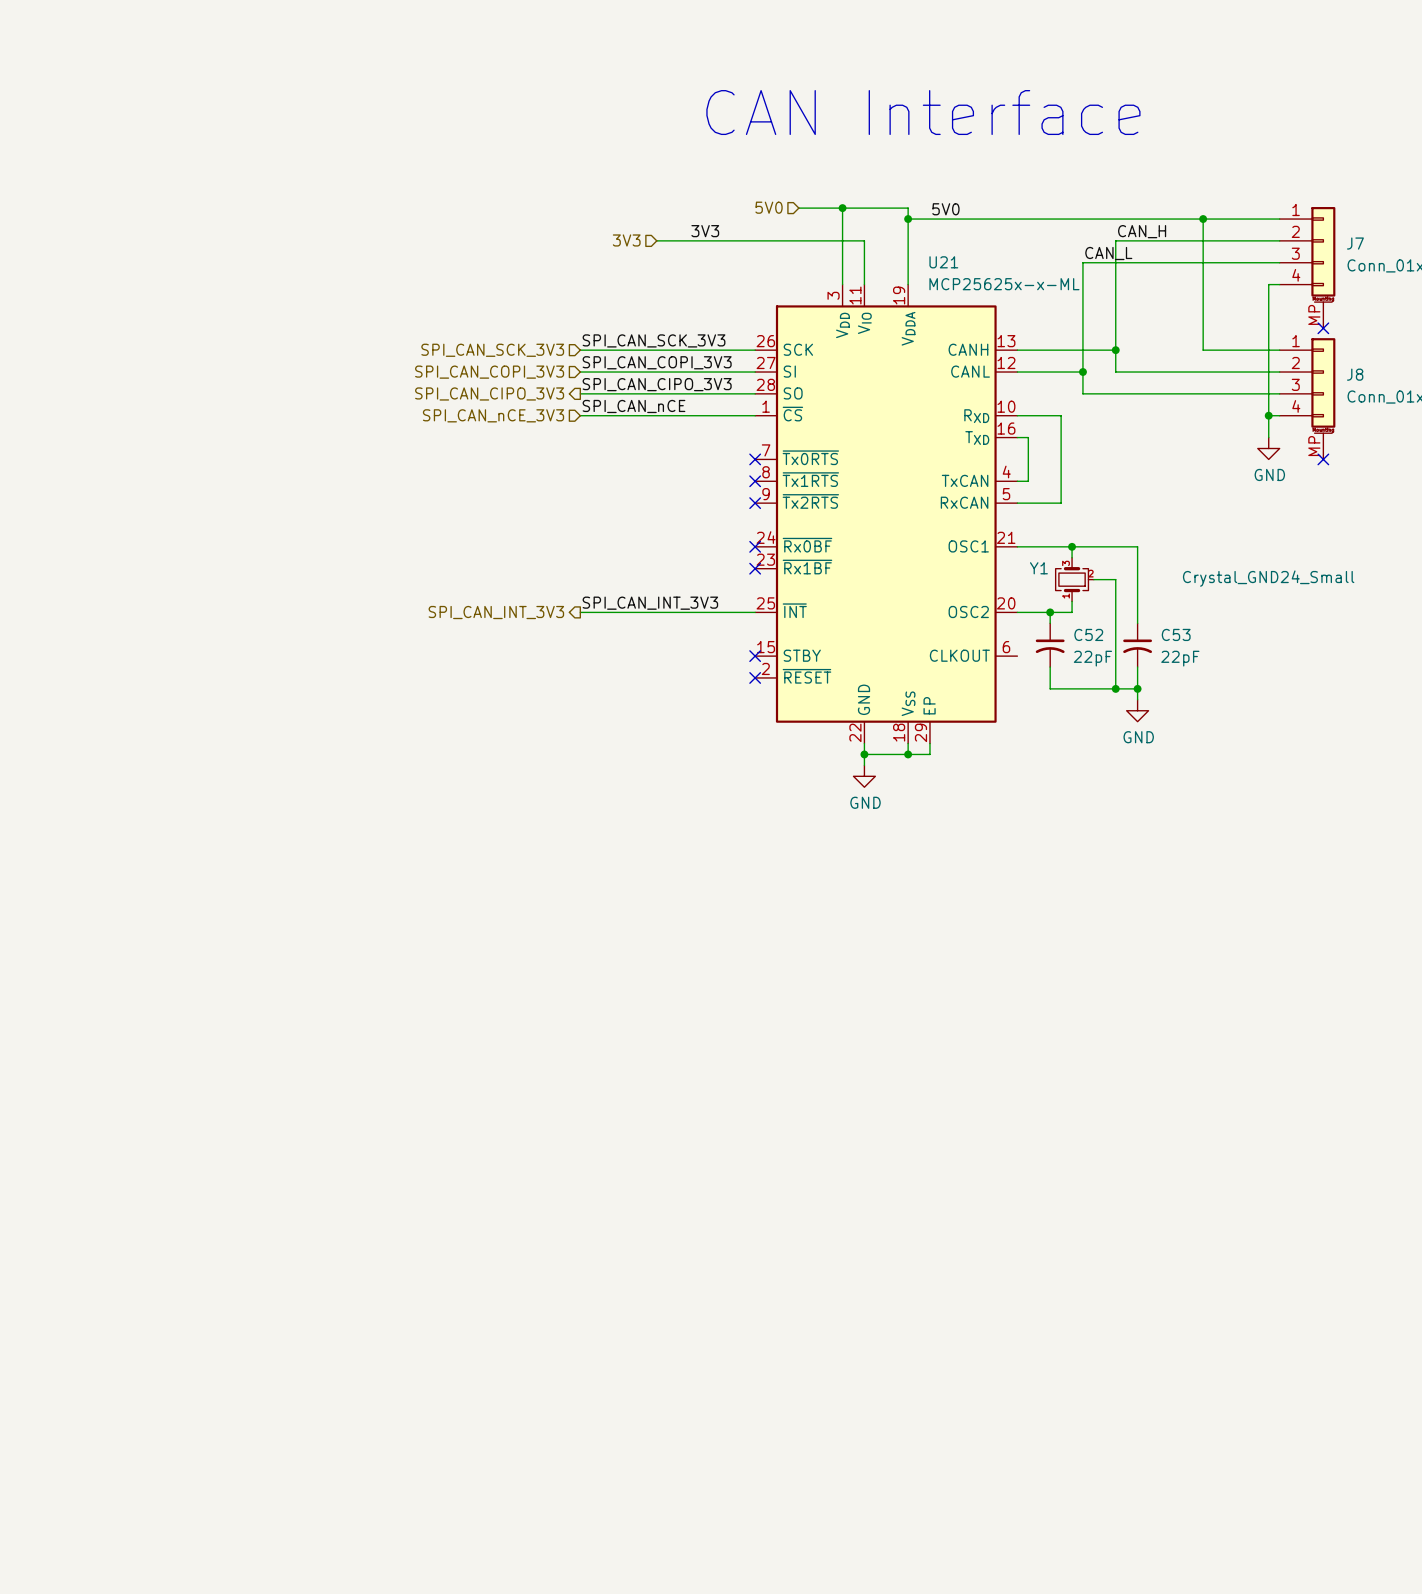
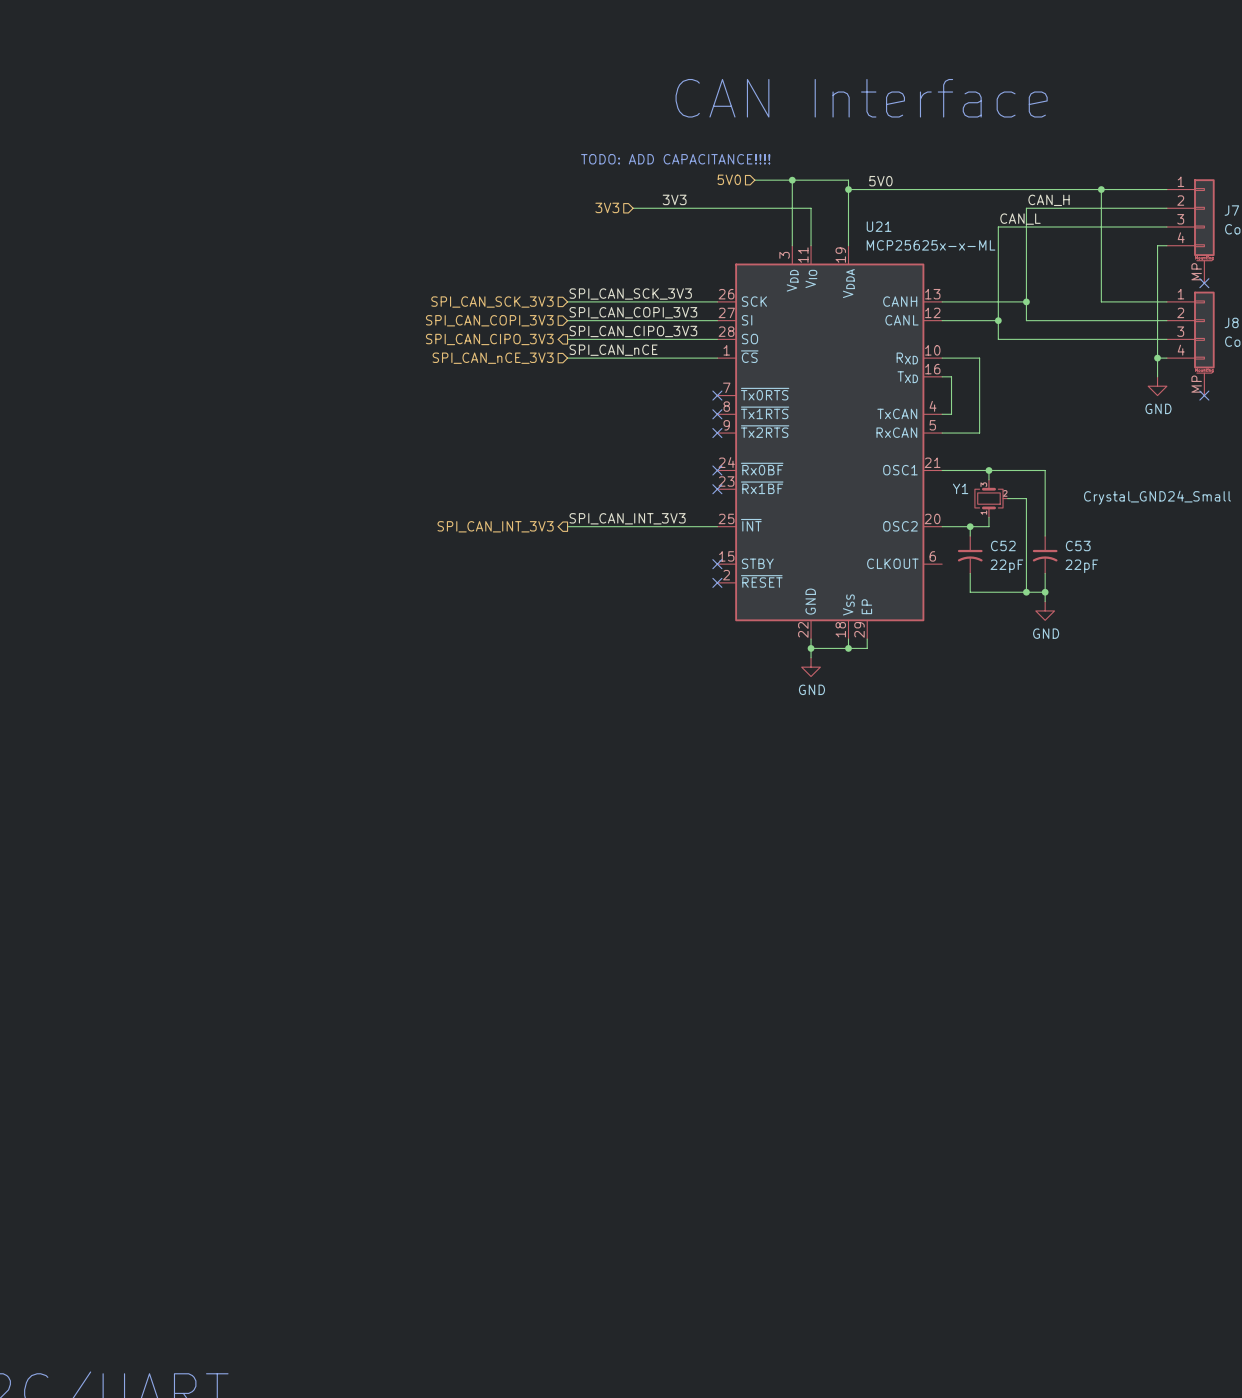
text: none -> TODO: ADD CAPACITANCE!!!! (675, 159)

